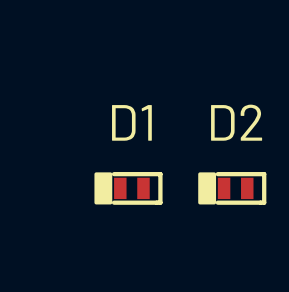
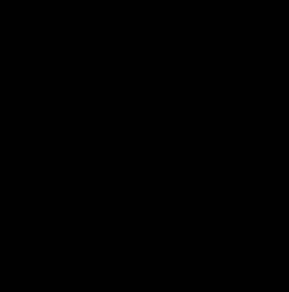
D1: (128, 188) -> none
D2: (232, 188) -> none

